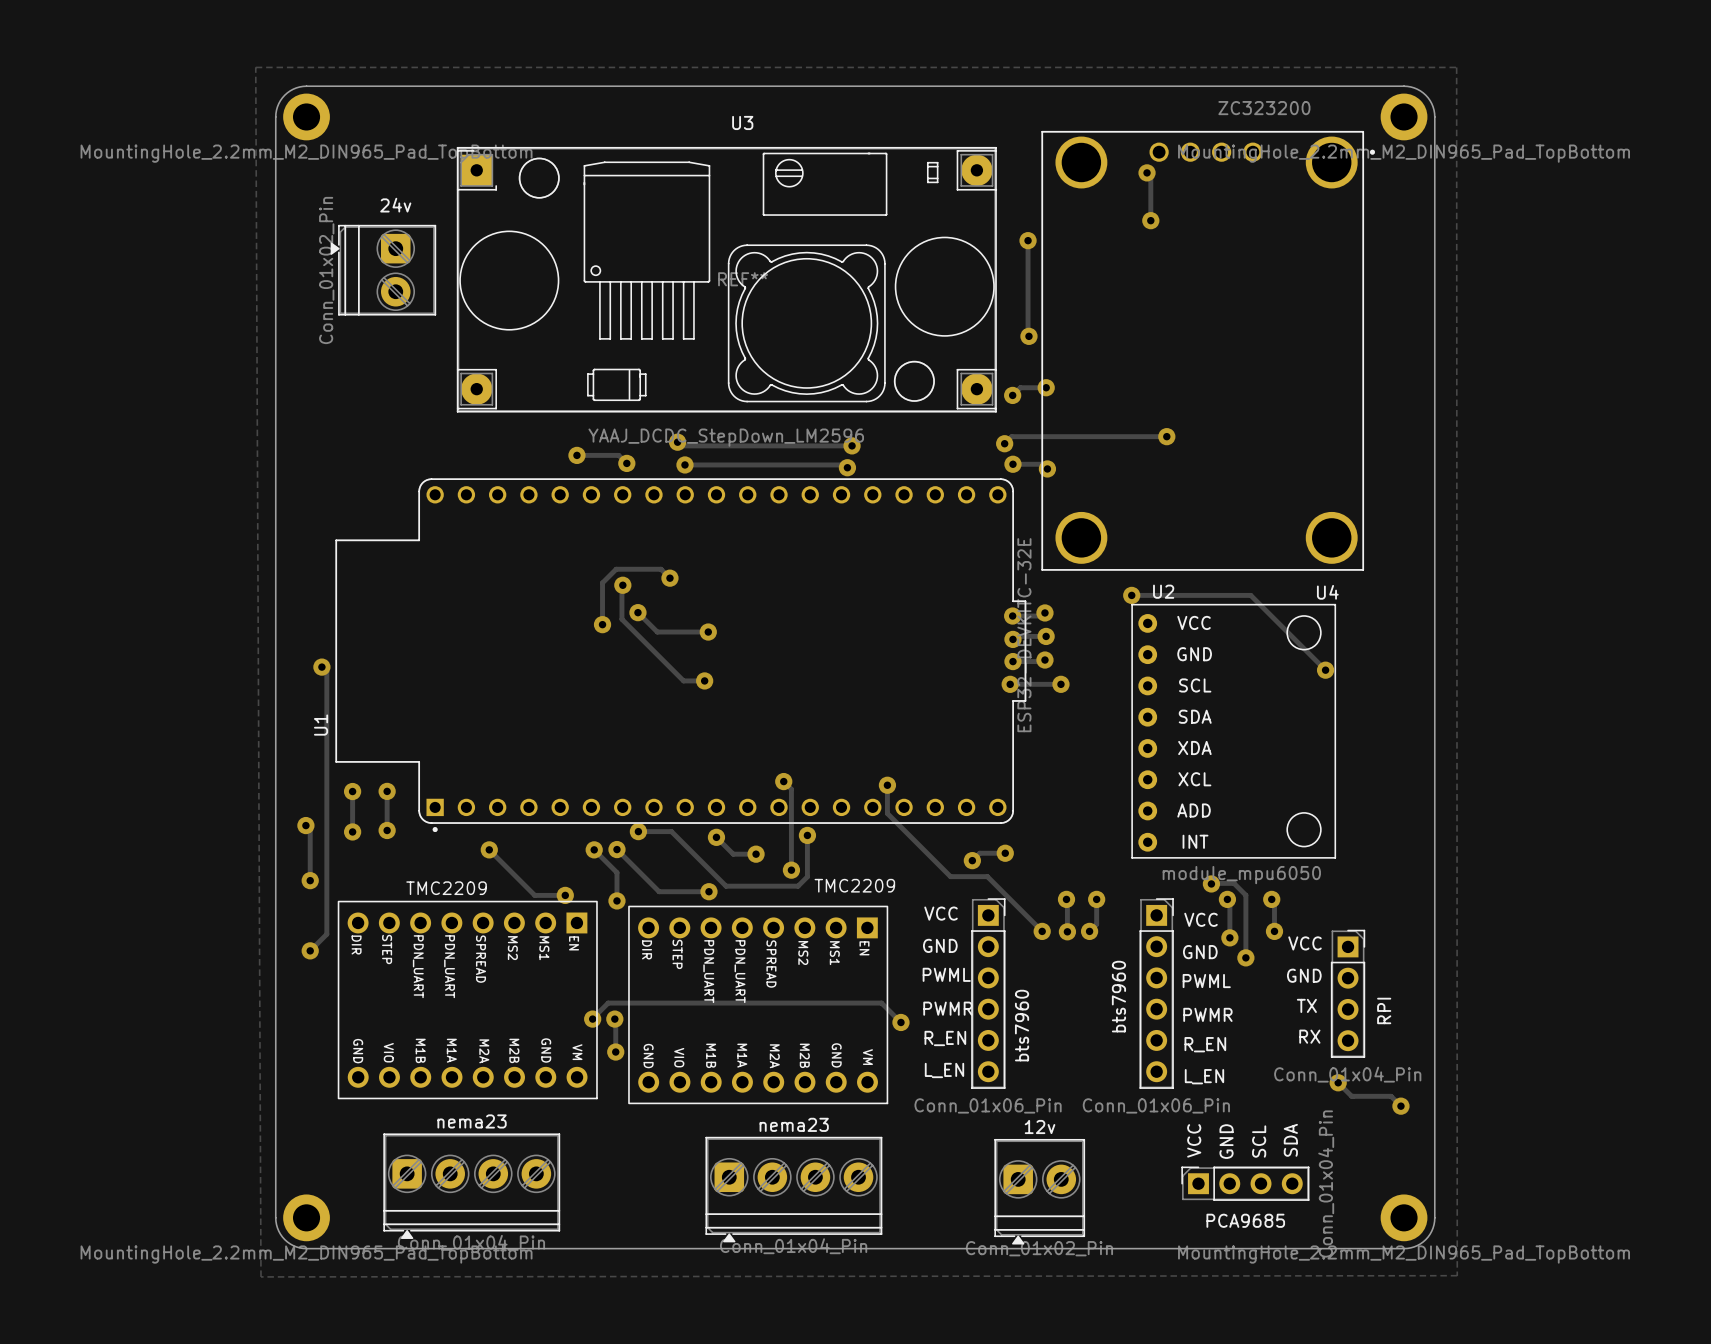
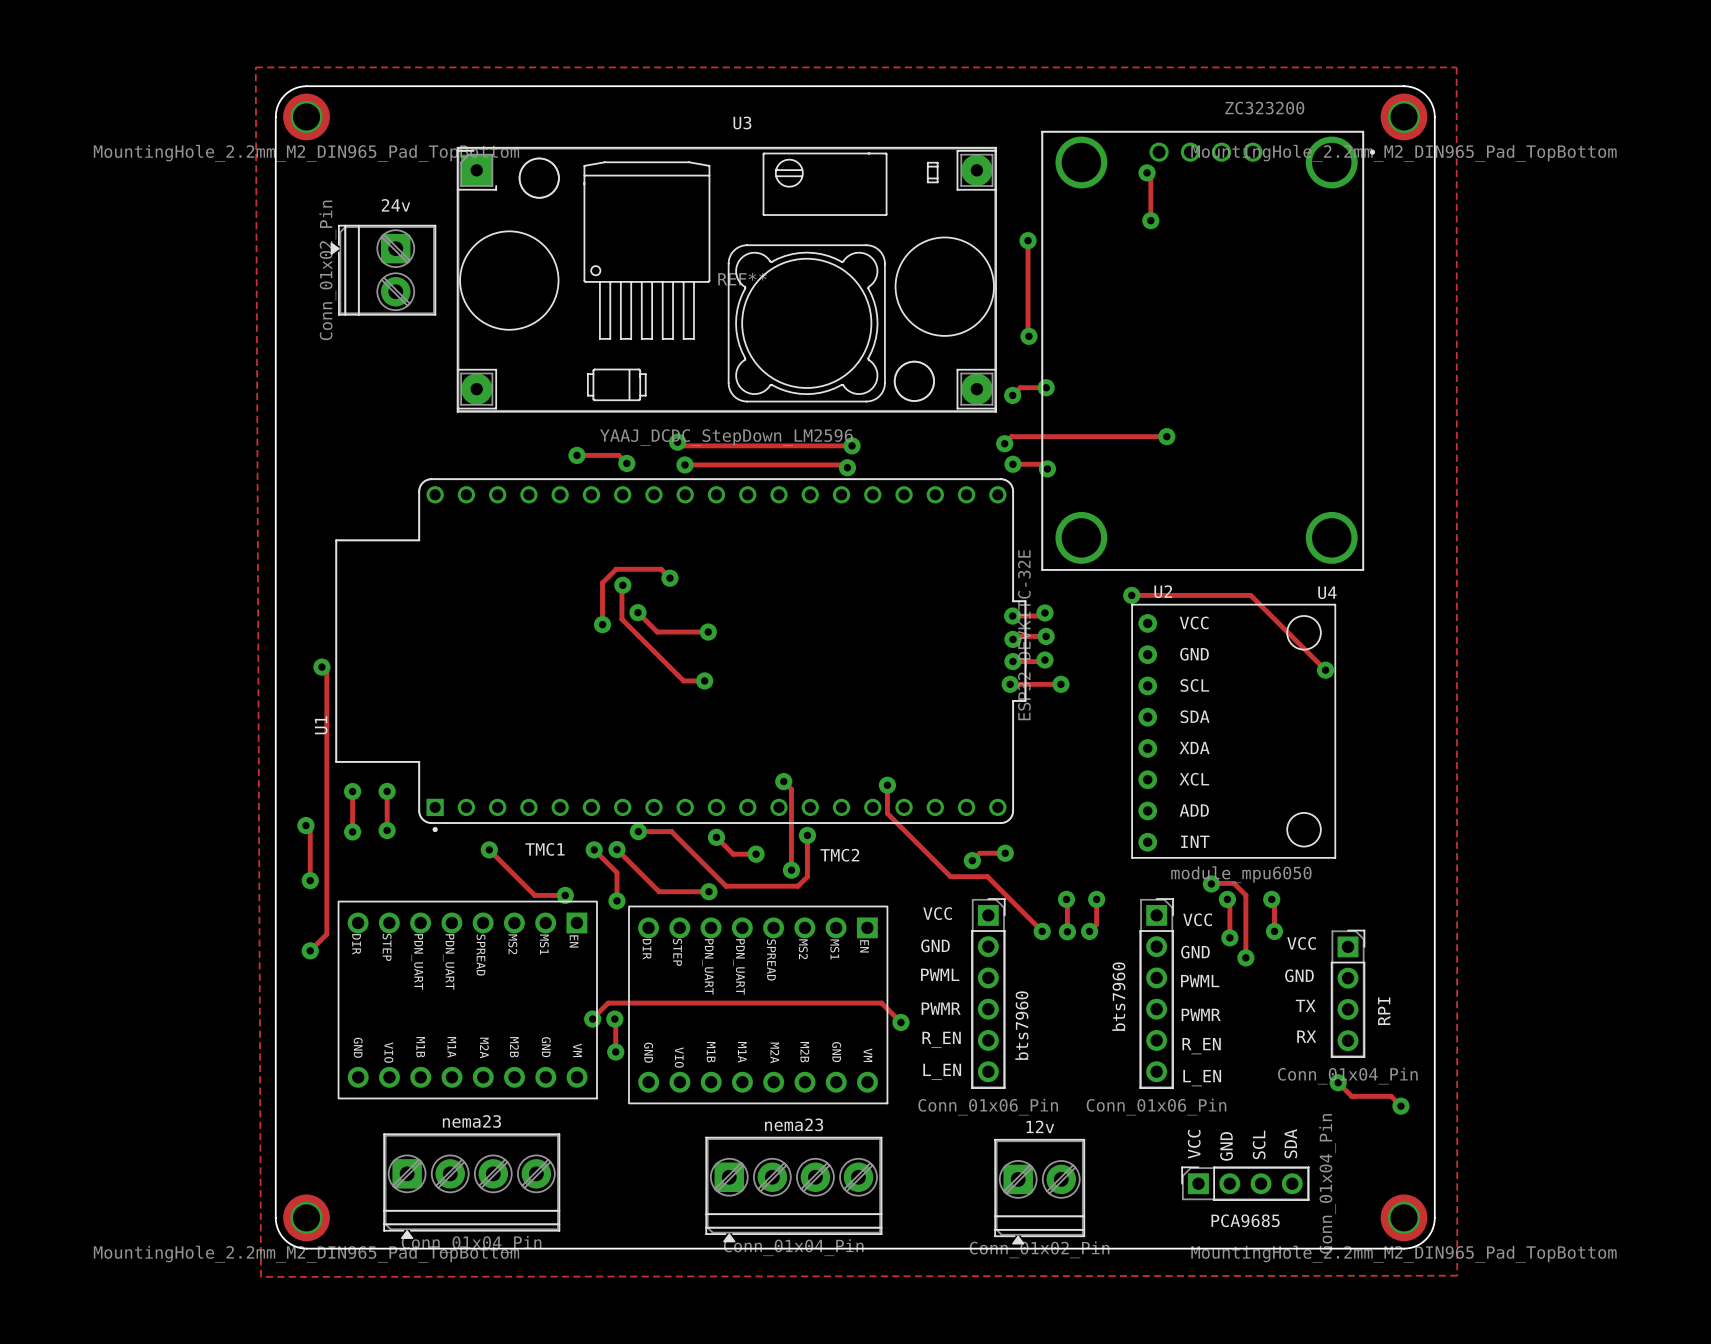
TMC2209 name: TMC2209 (854, 885) -> TMC2 (839, 855)
TMC2209 name: TMC2209 (446, 888) -> TMC1 (544, 849)

